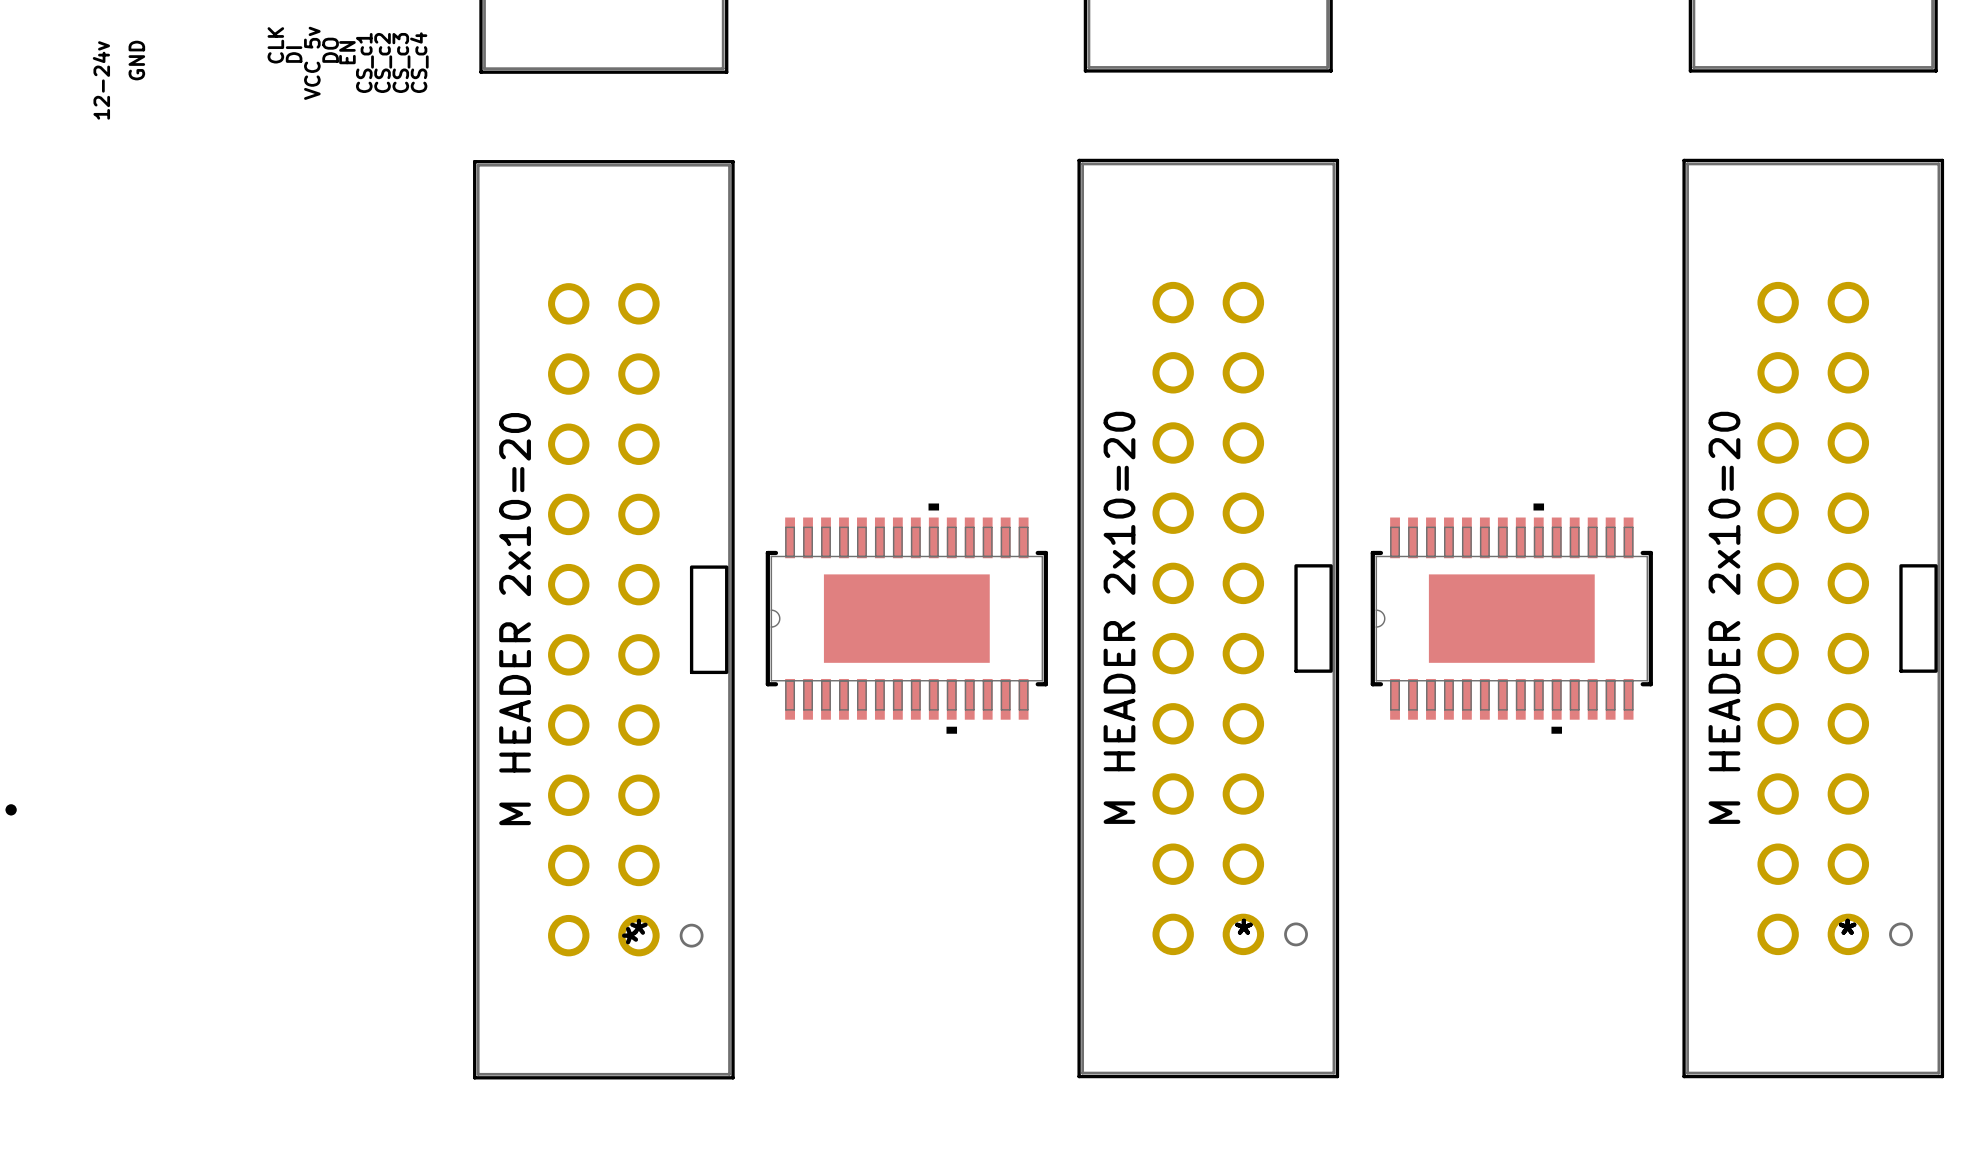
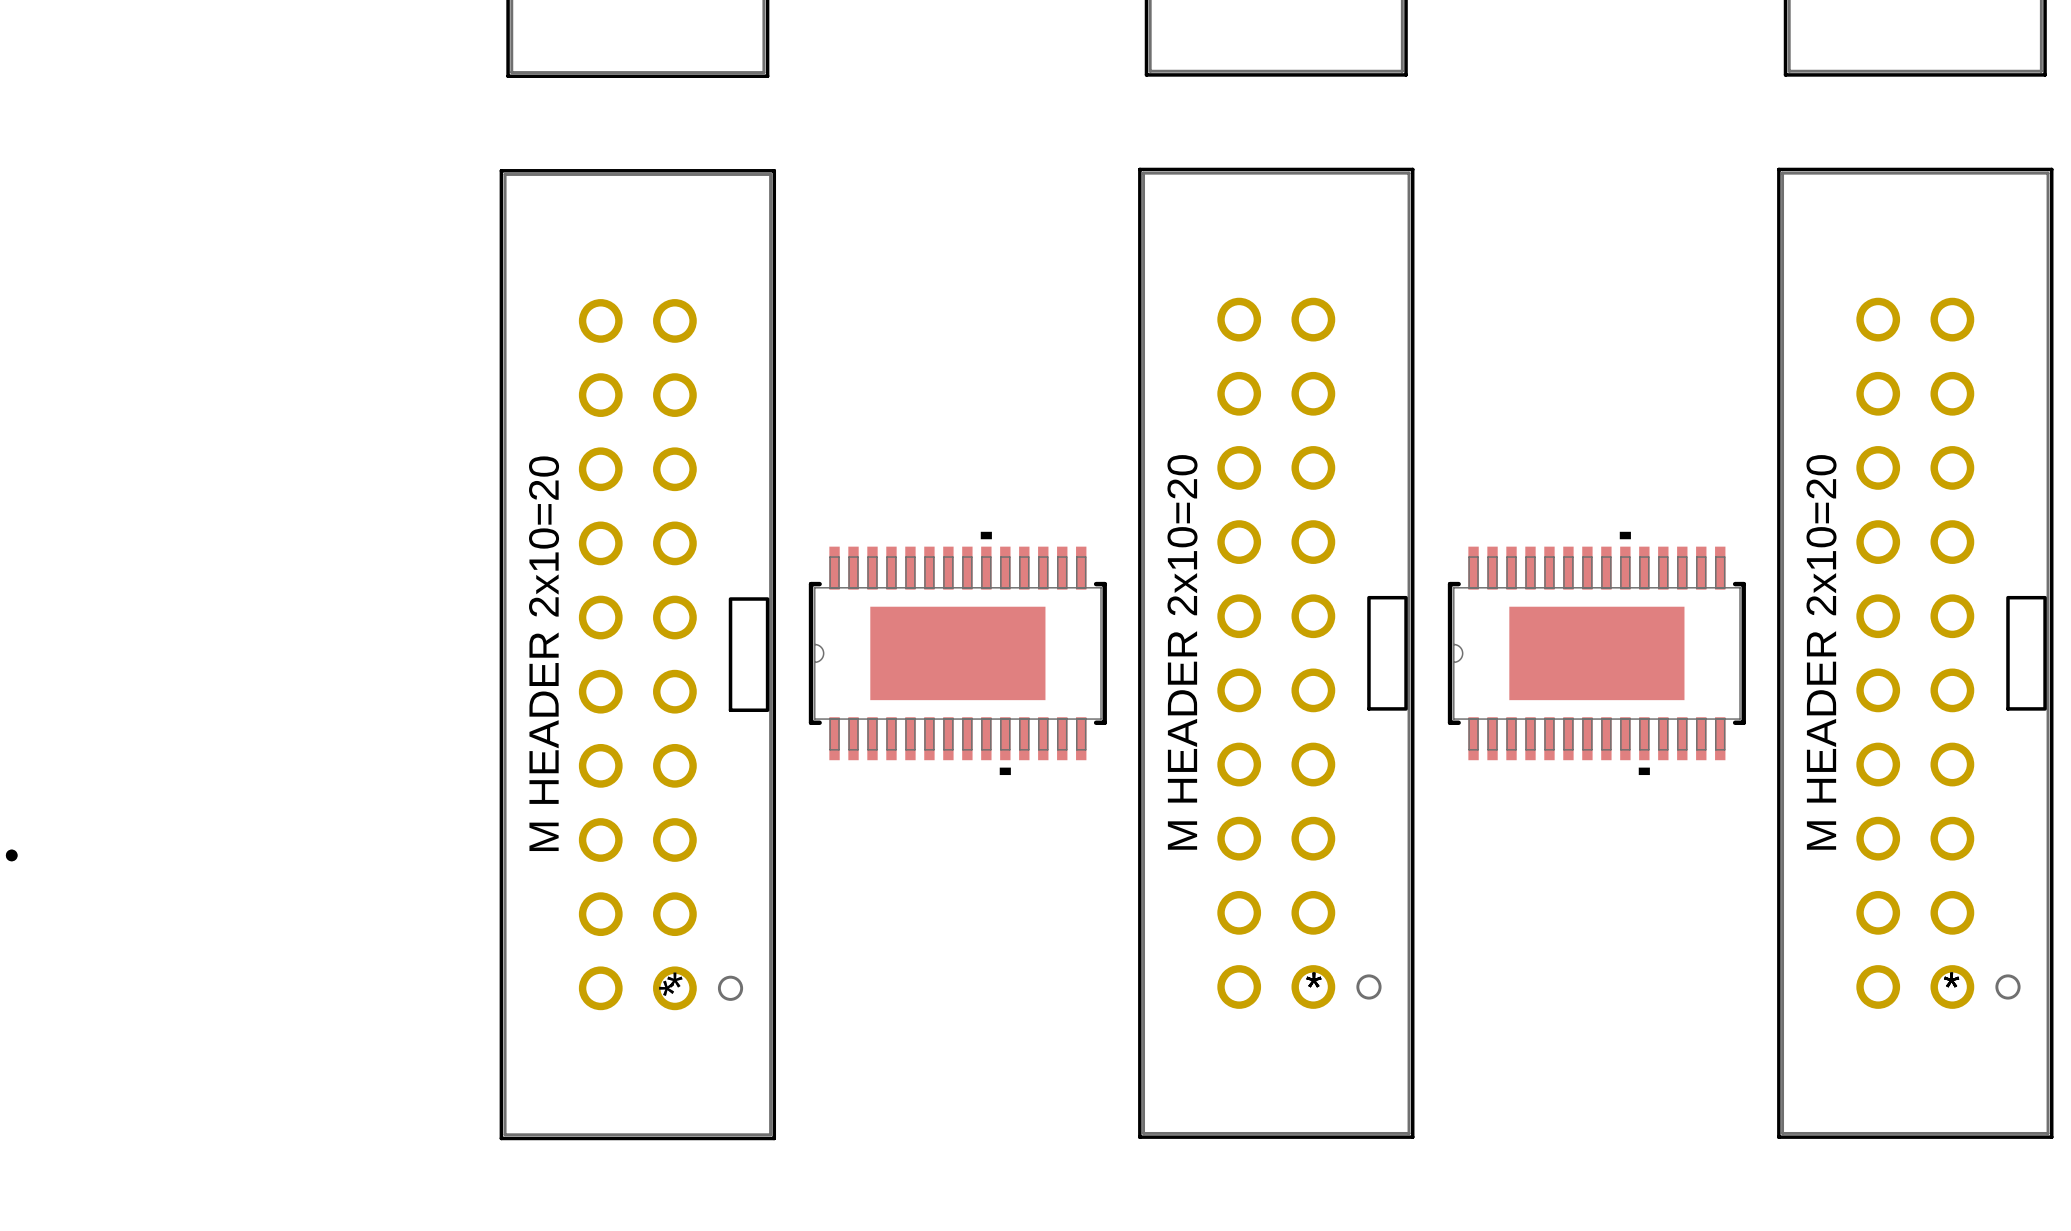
text: CLK (275, 45) -> none
text: DO (330, 50) -> none
text: EN (347, 52) -> none
text: DI (294, 54) -> none
text: GND (136, 60) -> none
text: CS_c1 (364, 62) -> none
text: CS_c2 (383, 62) -> none
text: CS_c3 (401, 62) -> none
text: CS_c4 (419, 62) -> none
text: VCC 5v (312, 63) -> none
text: 12-24v (101, 80) -> none

